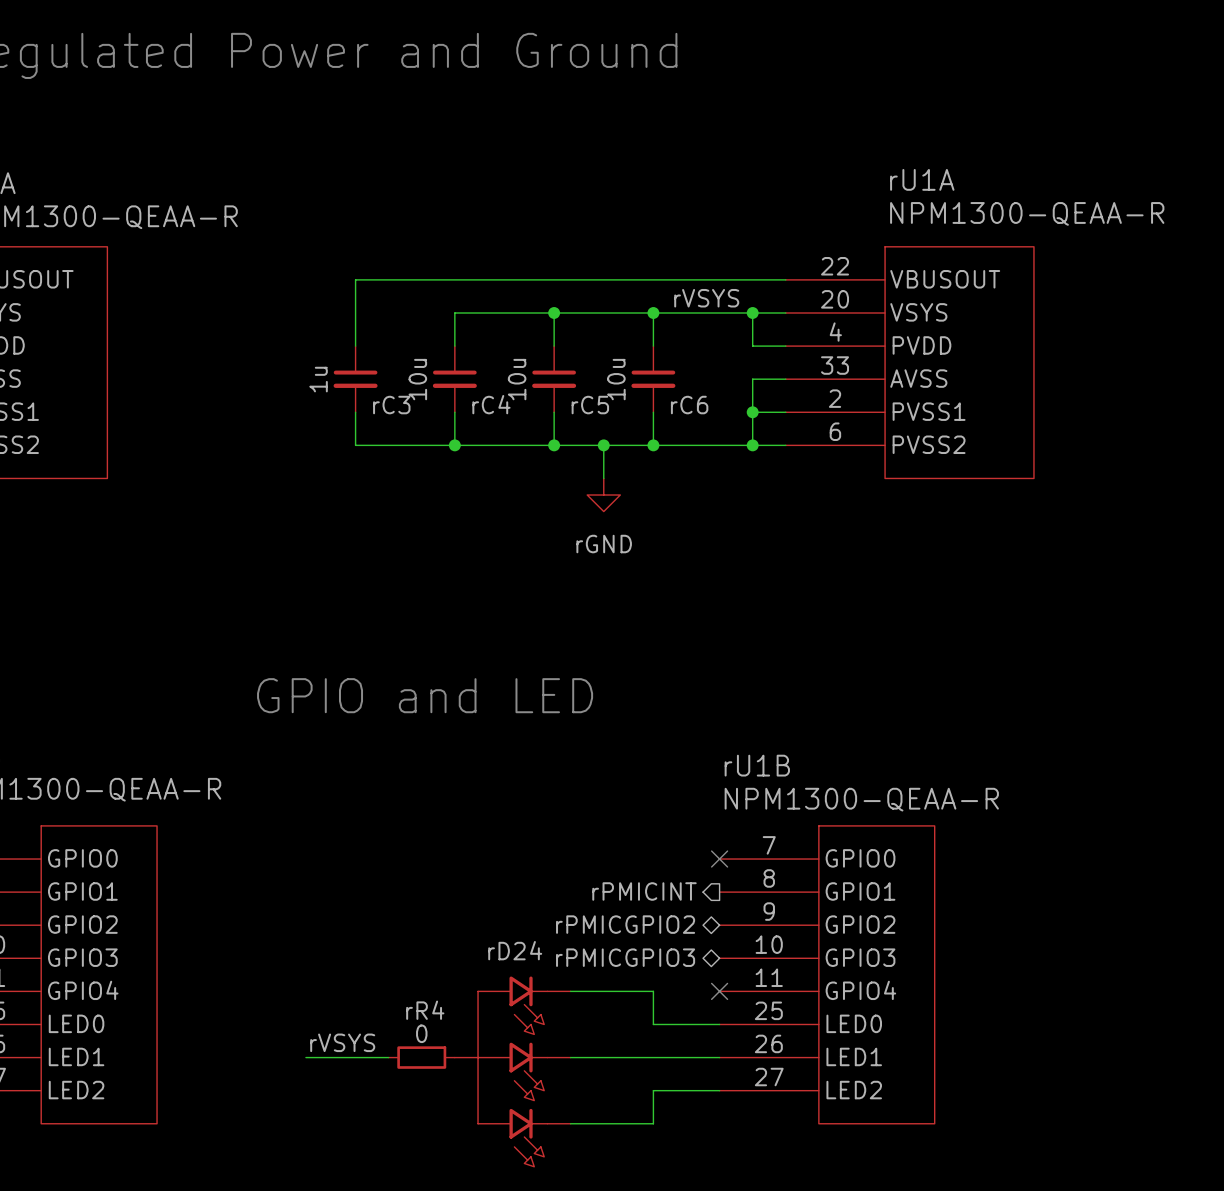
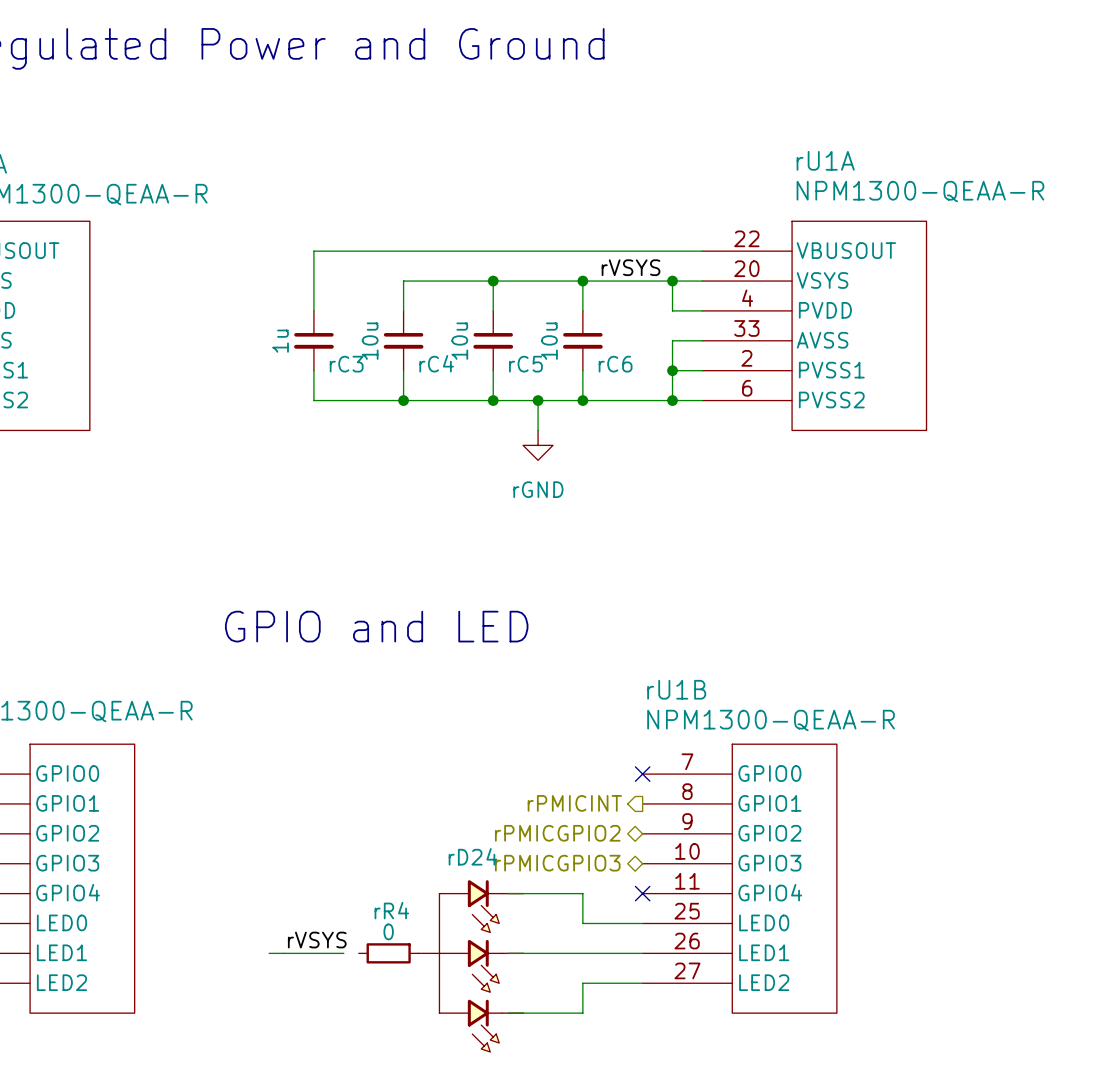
label position: rVSYS (342, 1042) -> rVSYS (317, 940)
rR4 position: (421, 1057) -> (388, 953)
rD24 position: (512, 1071) -> (470, 966)

